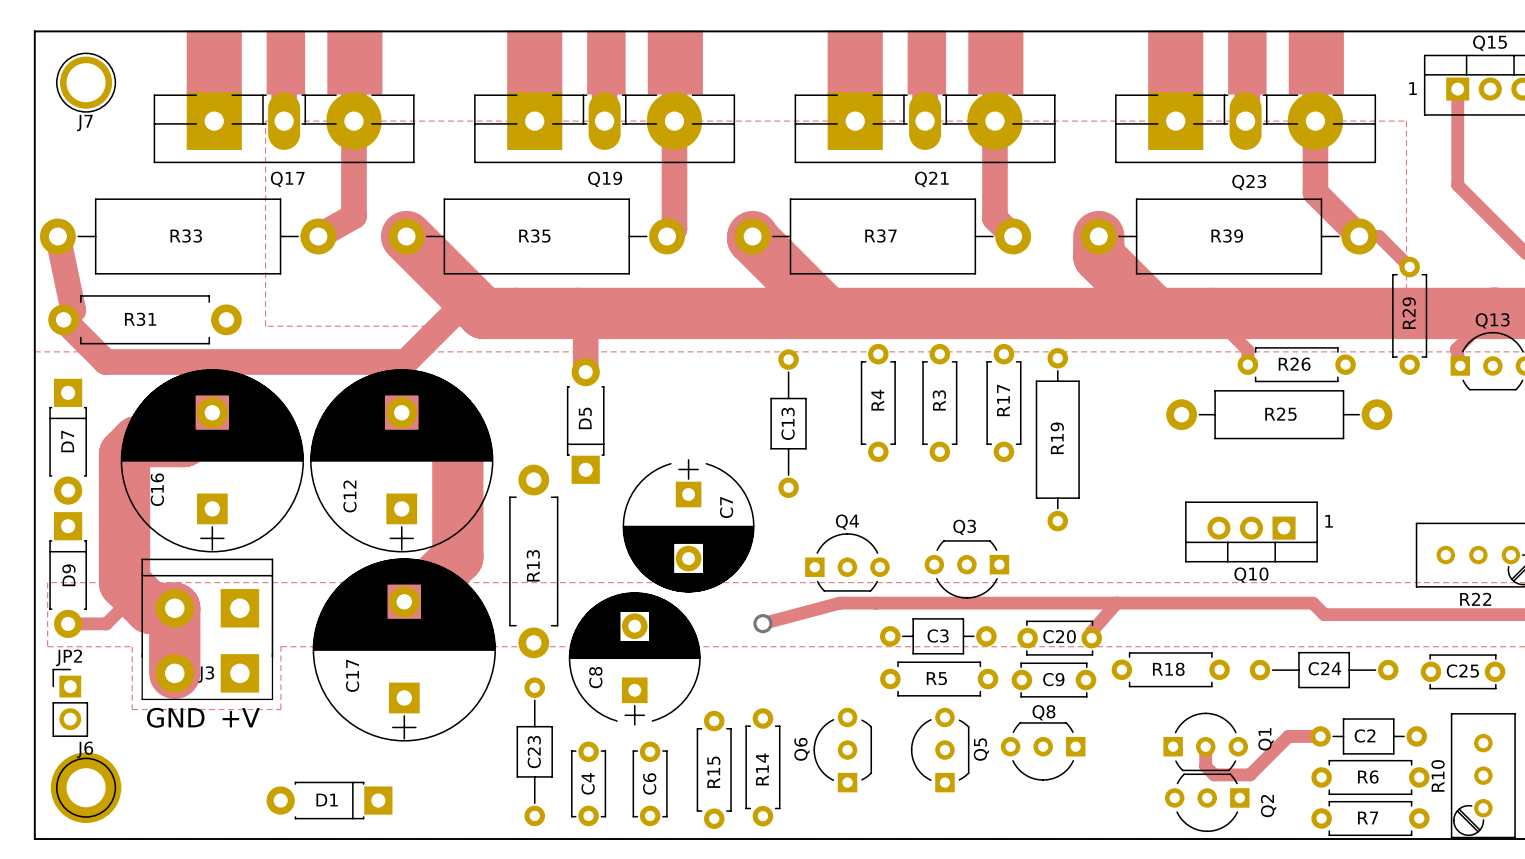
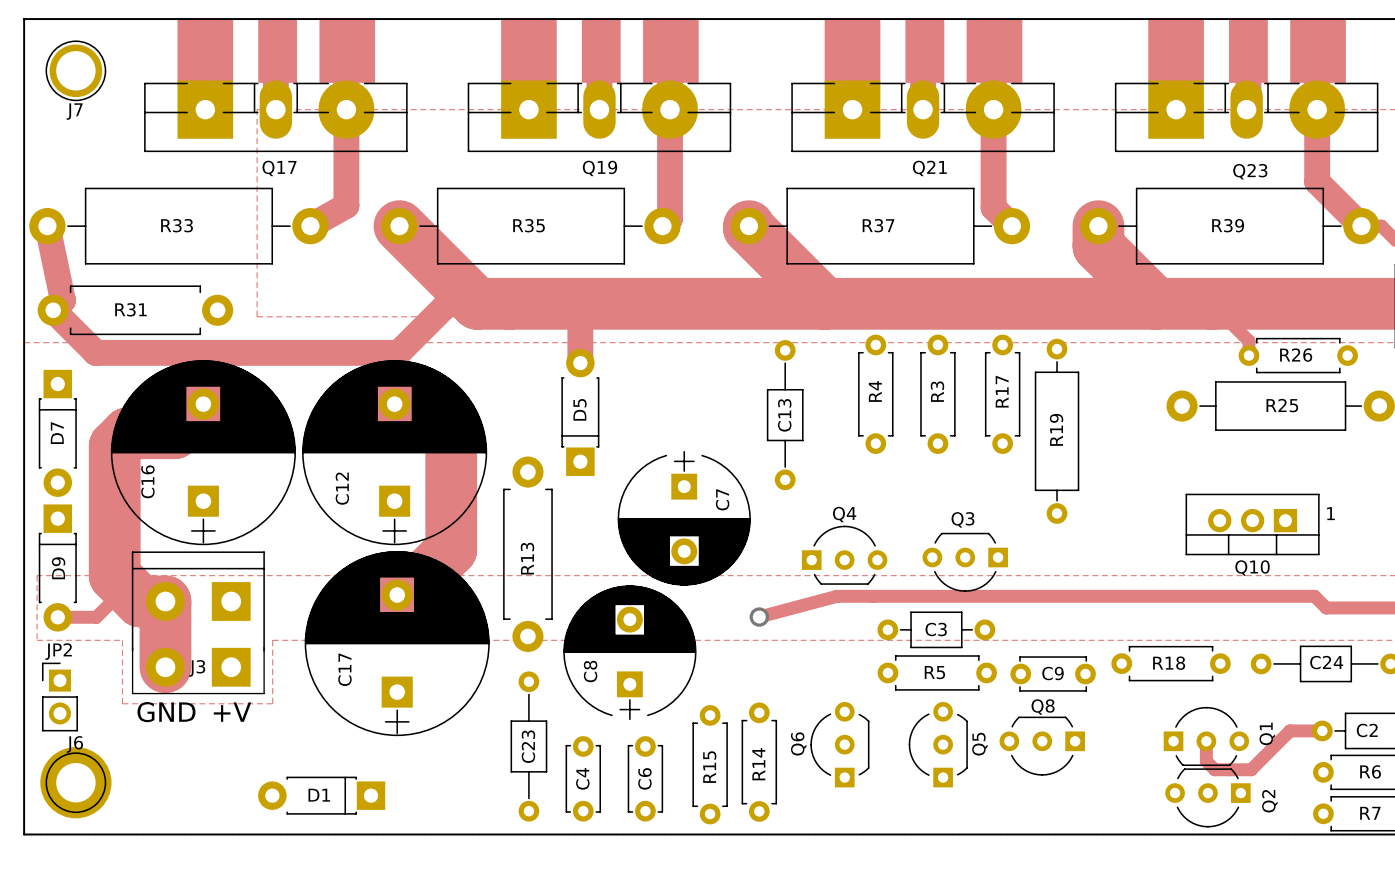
track: (1116, 603) (1091, 631) (1091, 638) -> none
C20: (1059, 638) -> none

